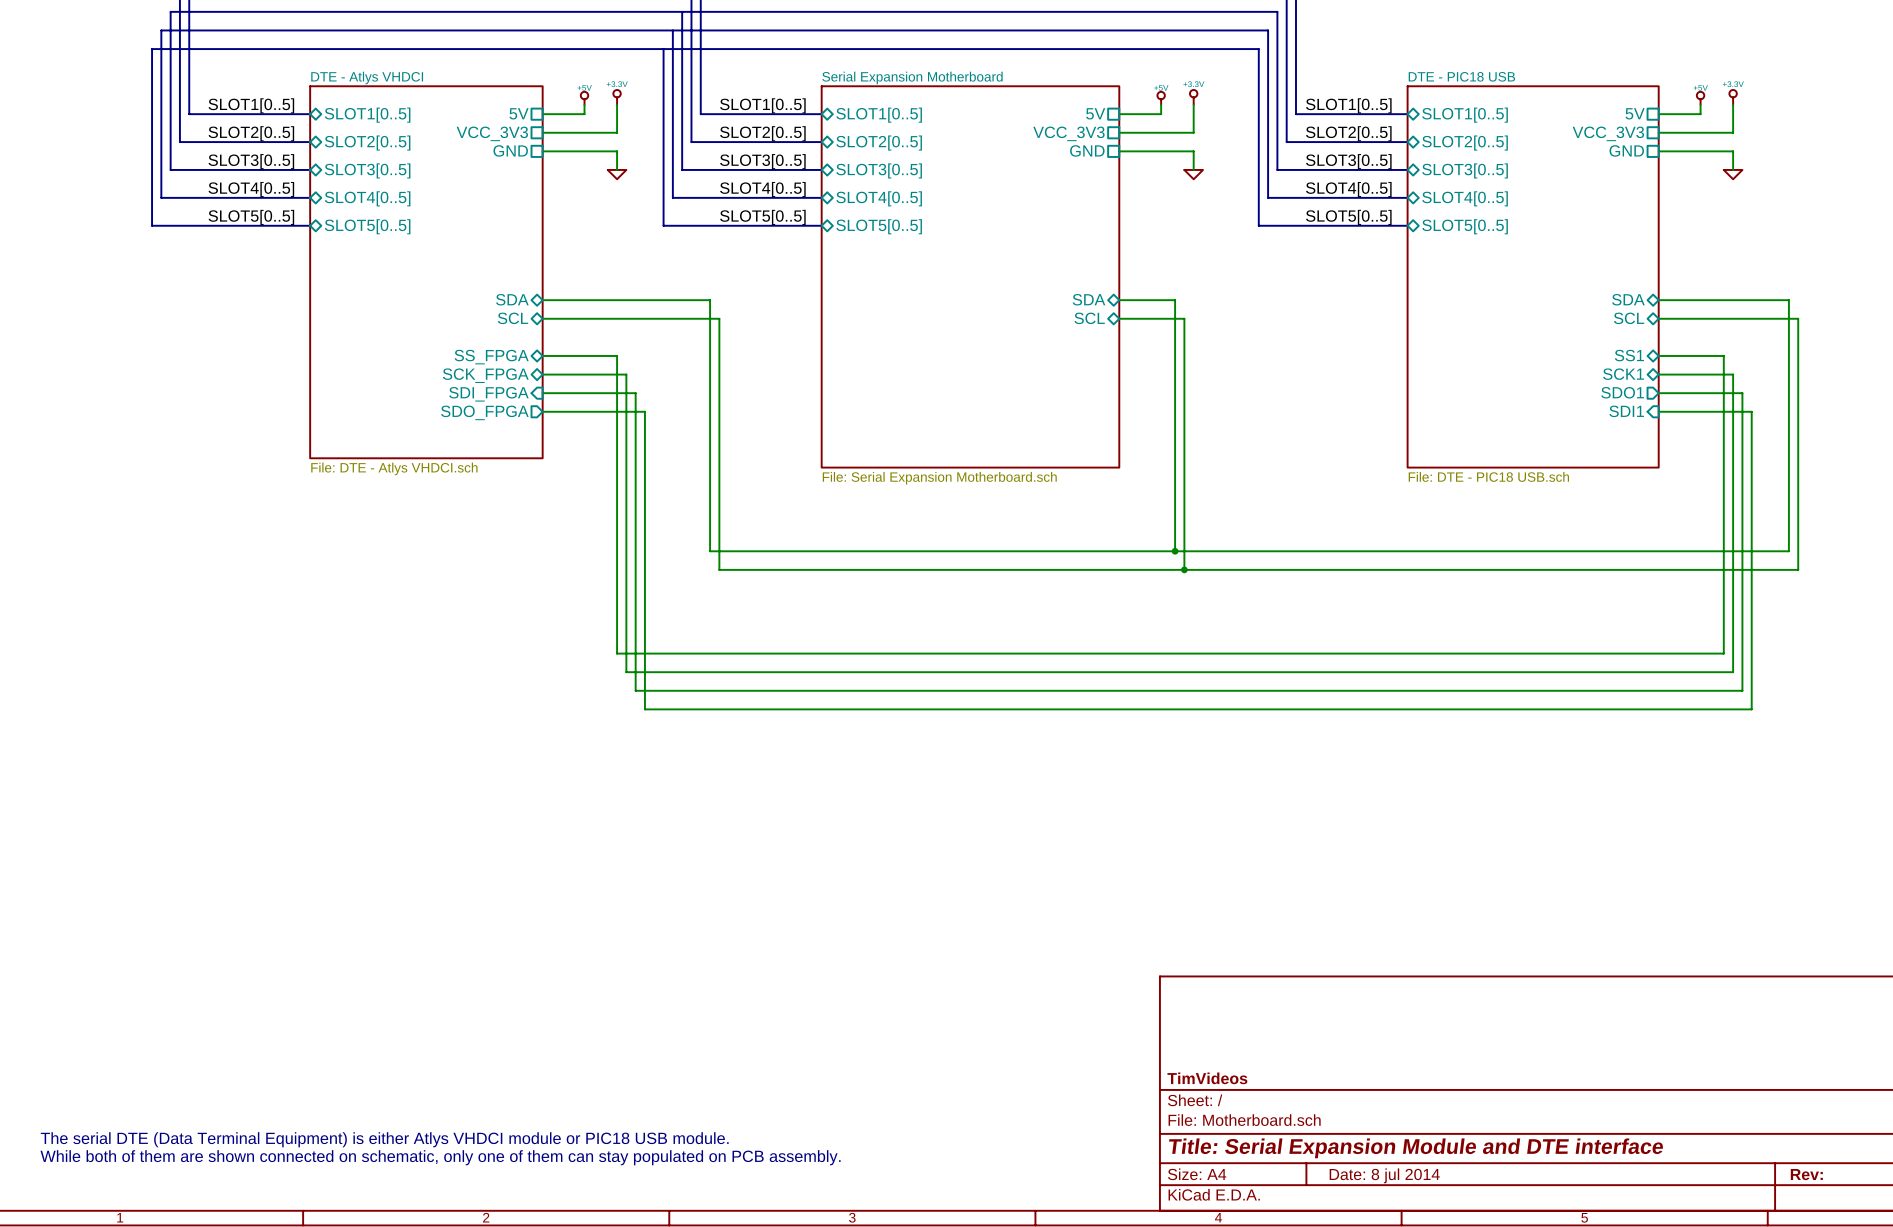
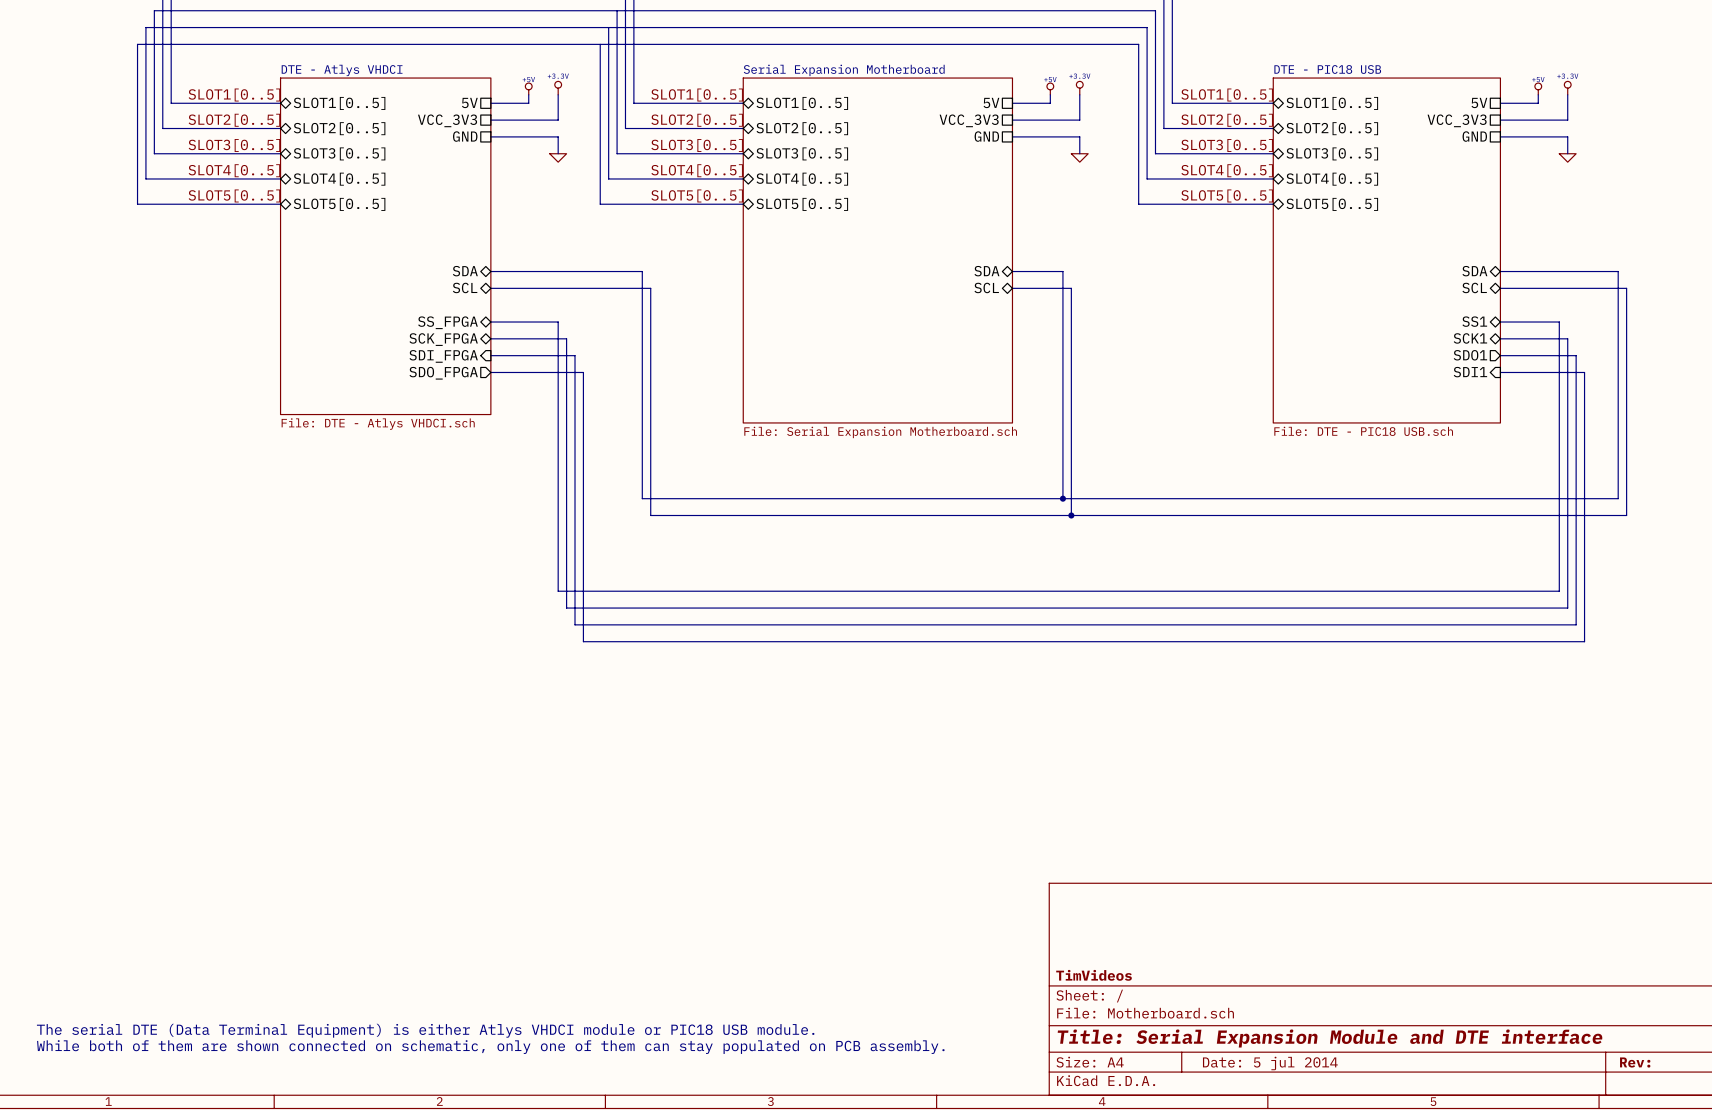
title block: Date: 8 jul 2014 (1384, 1175) -> Date: 5 jul 2014 (1270, 1063)

